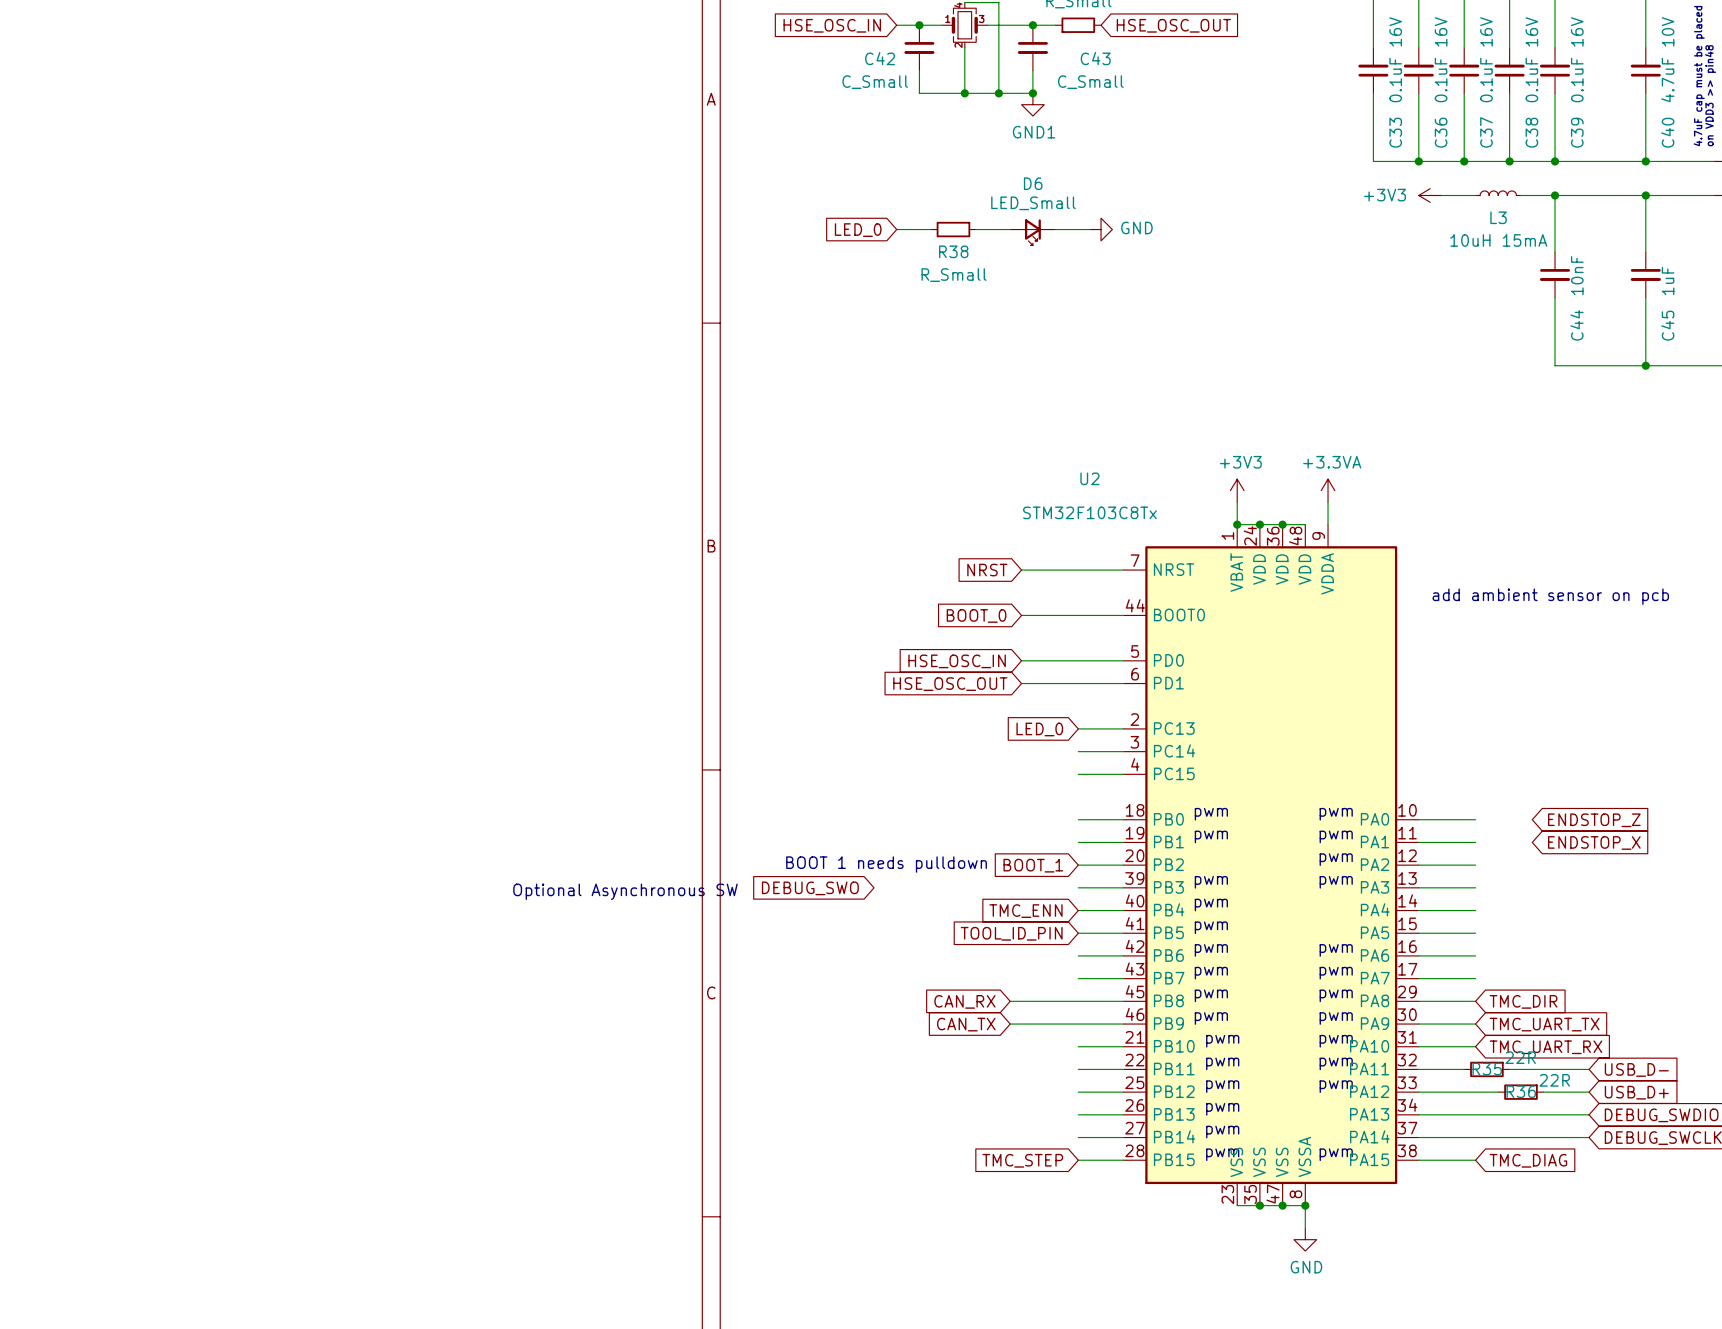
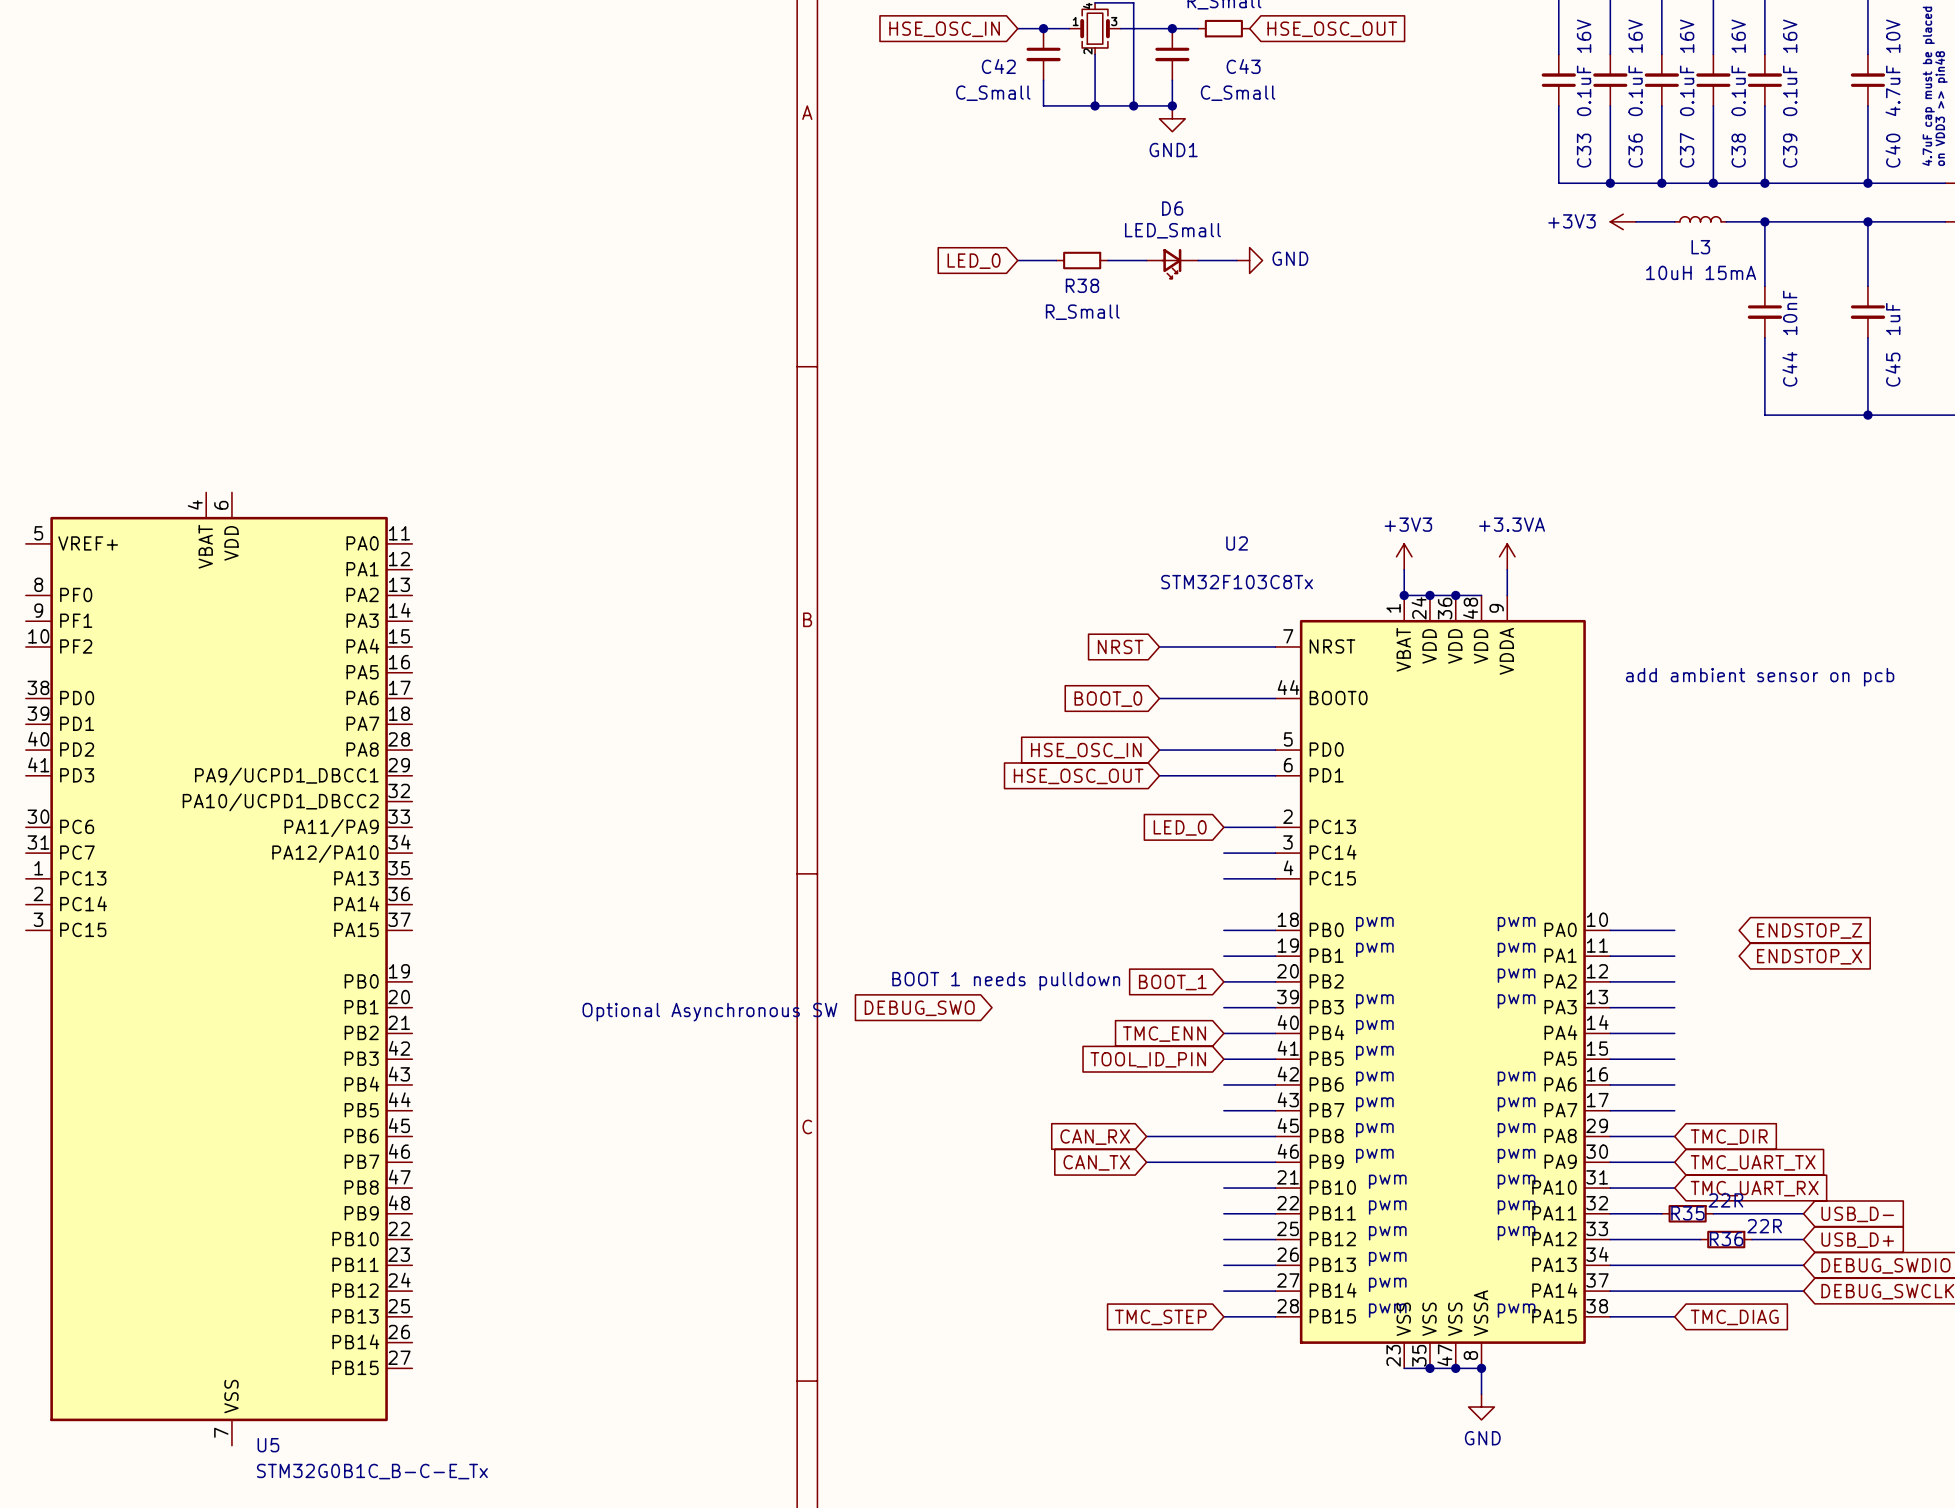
U5: none -> STM32G0B1C_B-C-E_Tx (219, 969)

